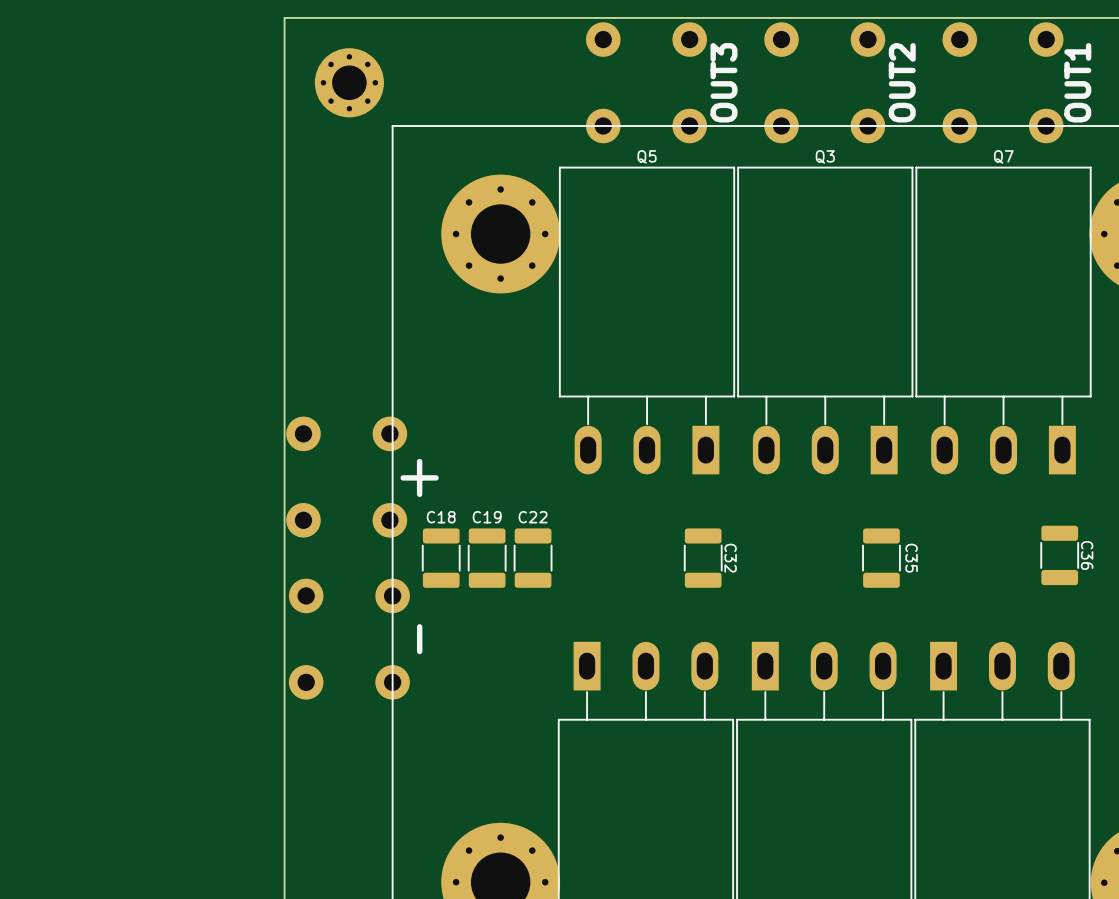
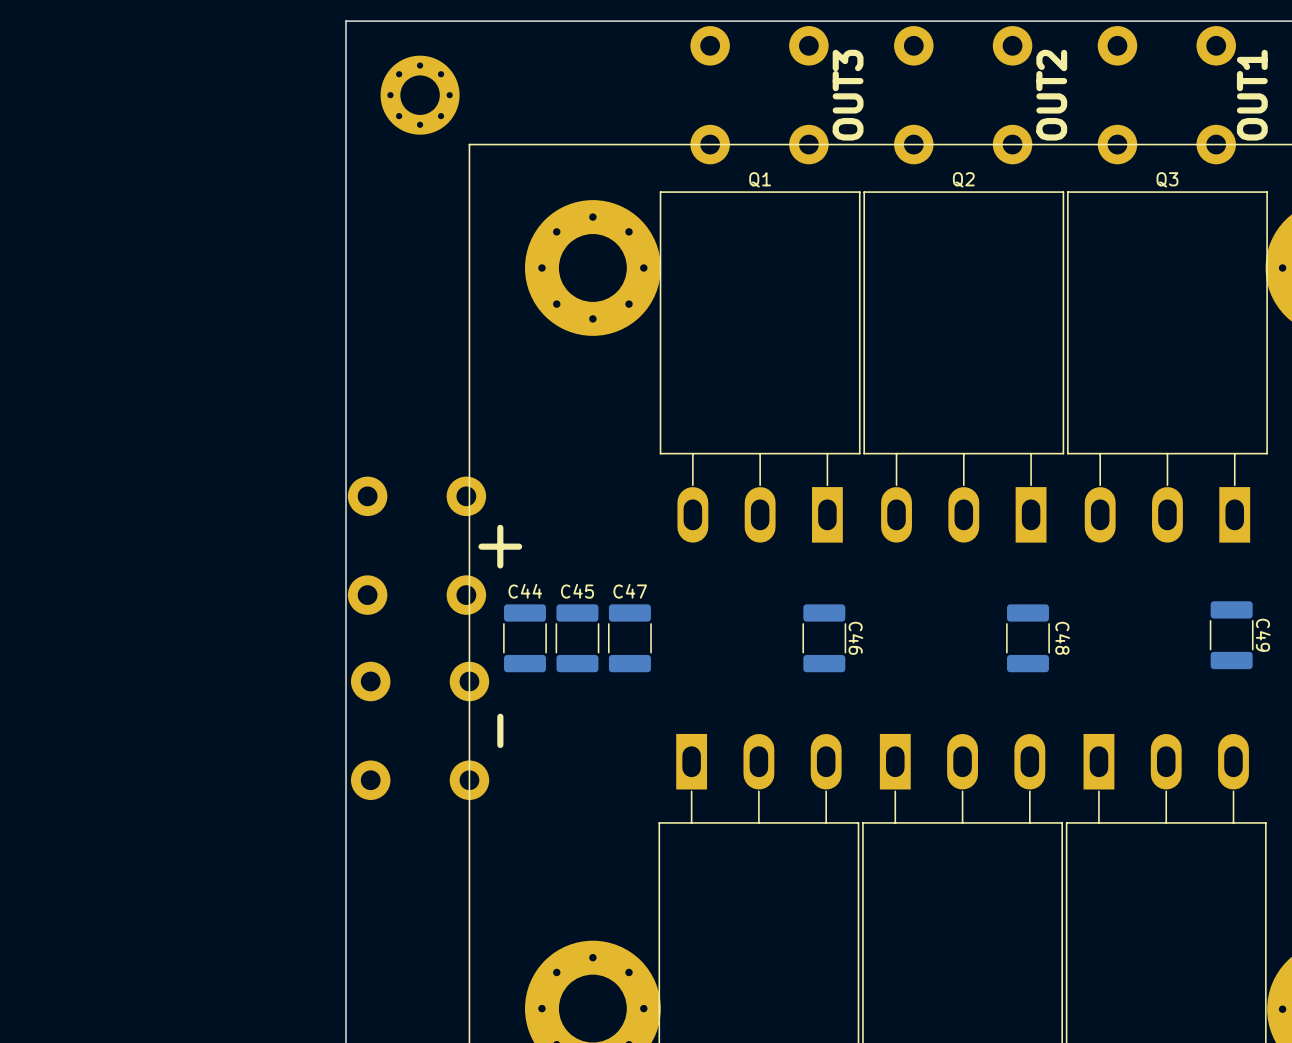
Q5 name: Q5 (647, 156) -> Q1 (760, 179)
Q3 name: Q3 (825, 156) -> Q2 (963, 179)
Q7 name: Q7 (1003, 156) -> Q3 (1167, 179)
C18 name: C18 (441, 517) -> C44 (525, 591)
C19 name: C19 (487, 517) -> C45 (577, 591)
C22 name: C22 (533, 517) -> C47 (630, 591)
C36 name: C36 (1087, 555) -> C49 (1263, 635)
C32 name: C32 (730, 558) -> C46 (855, 638)
C35 name: C35 (911, 558) -> C48 (1062, 638)

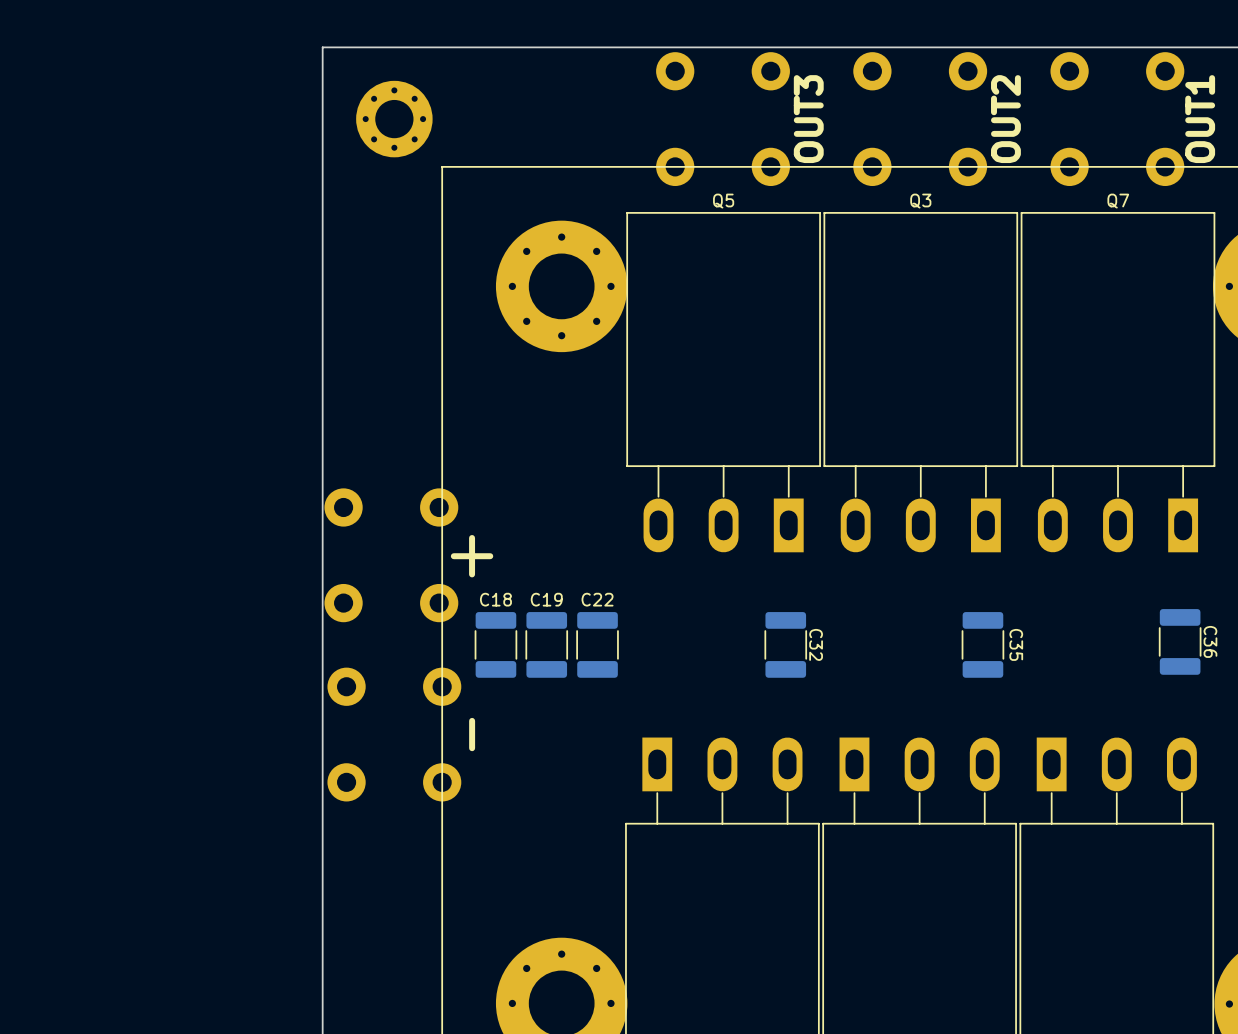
Q1 name: Q1 (760, 179) -> Q5 (723, 201)
Q2 name: Q2 (963, 179) -> Q3 (920, 201)
Q3 name: Q3 (1167, 179) -> Q7 (1118, 201)
C44 name: C44 (525, 591) -> C18 (495, 599)
C45 name: C45 (577, 591) -> C19 (546, 599)
C47 name: C47 (630, 591) -> C22 (597, 599)
C49 name: C49 (1263, 635) -> C36 (1210, 641)
C46 name: C46 (855, 638) -> C32 (816, 644)
C48 name: C48 (1062, 638) -> C35 (1016, 644)

